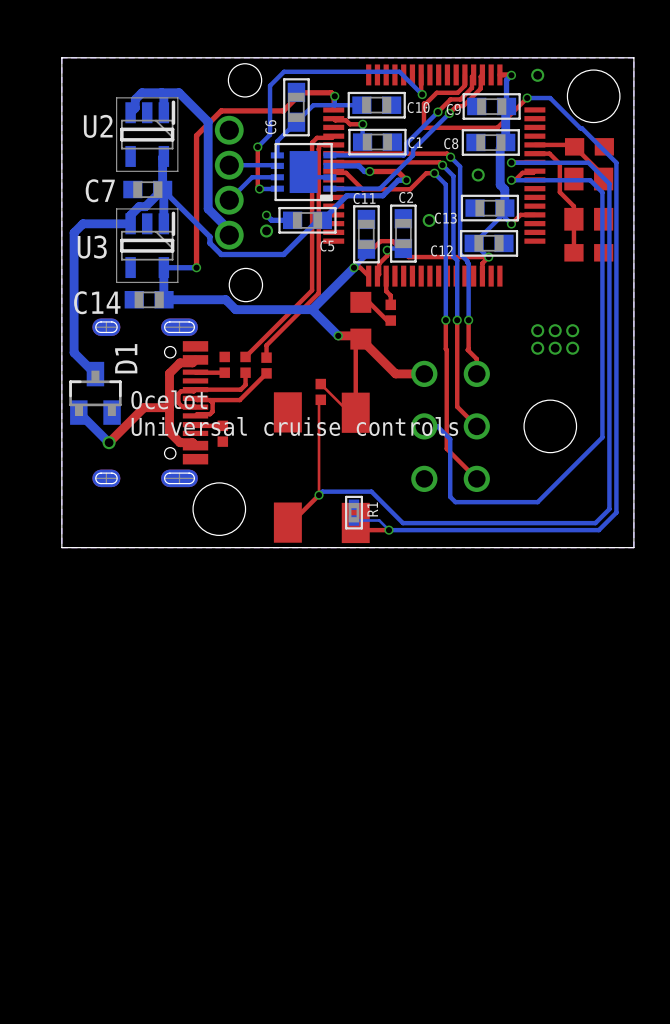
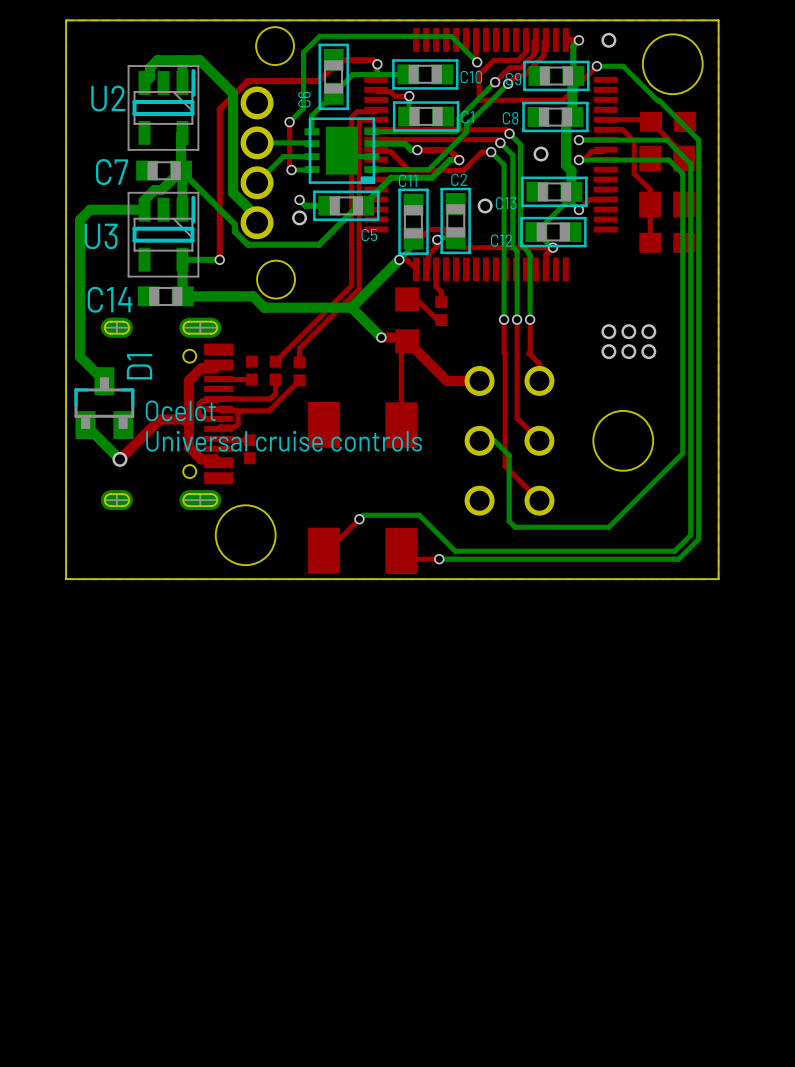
top track: (320, 384) (349, 412) (355, 412) -> none
part: (320, 391) -> none
top track: (320, 399) (319, 401) (319, 495) -> none
R1: (354, 512) -> none
bottom track: (354, 520) (379, 520) (388, 530) -> none

